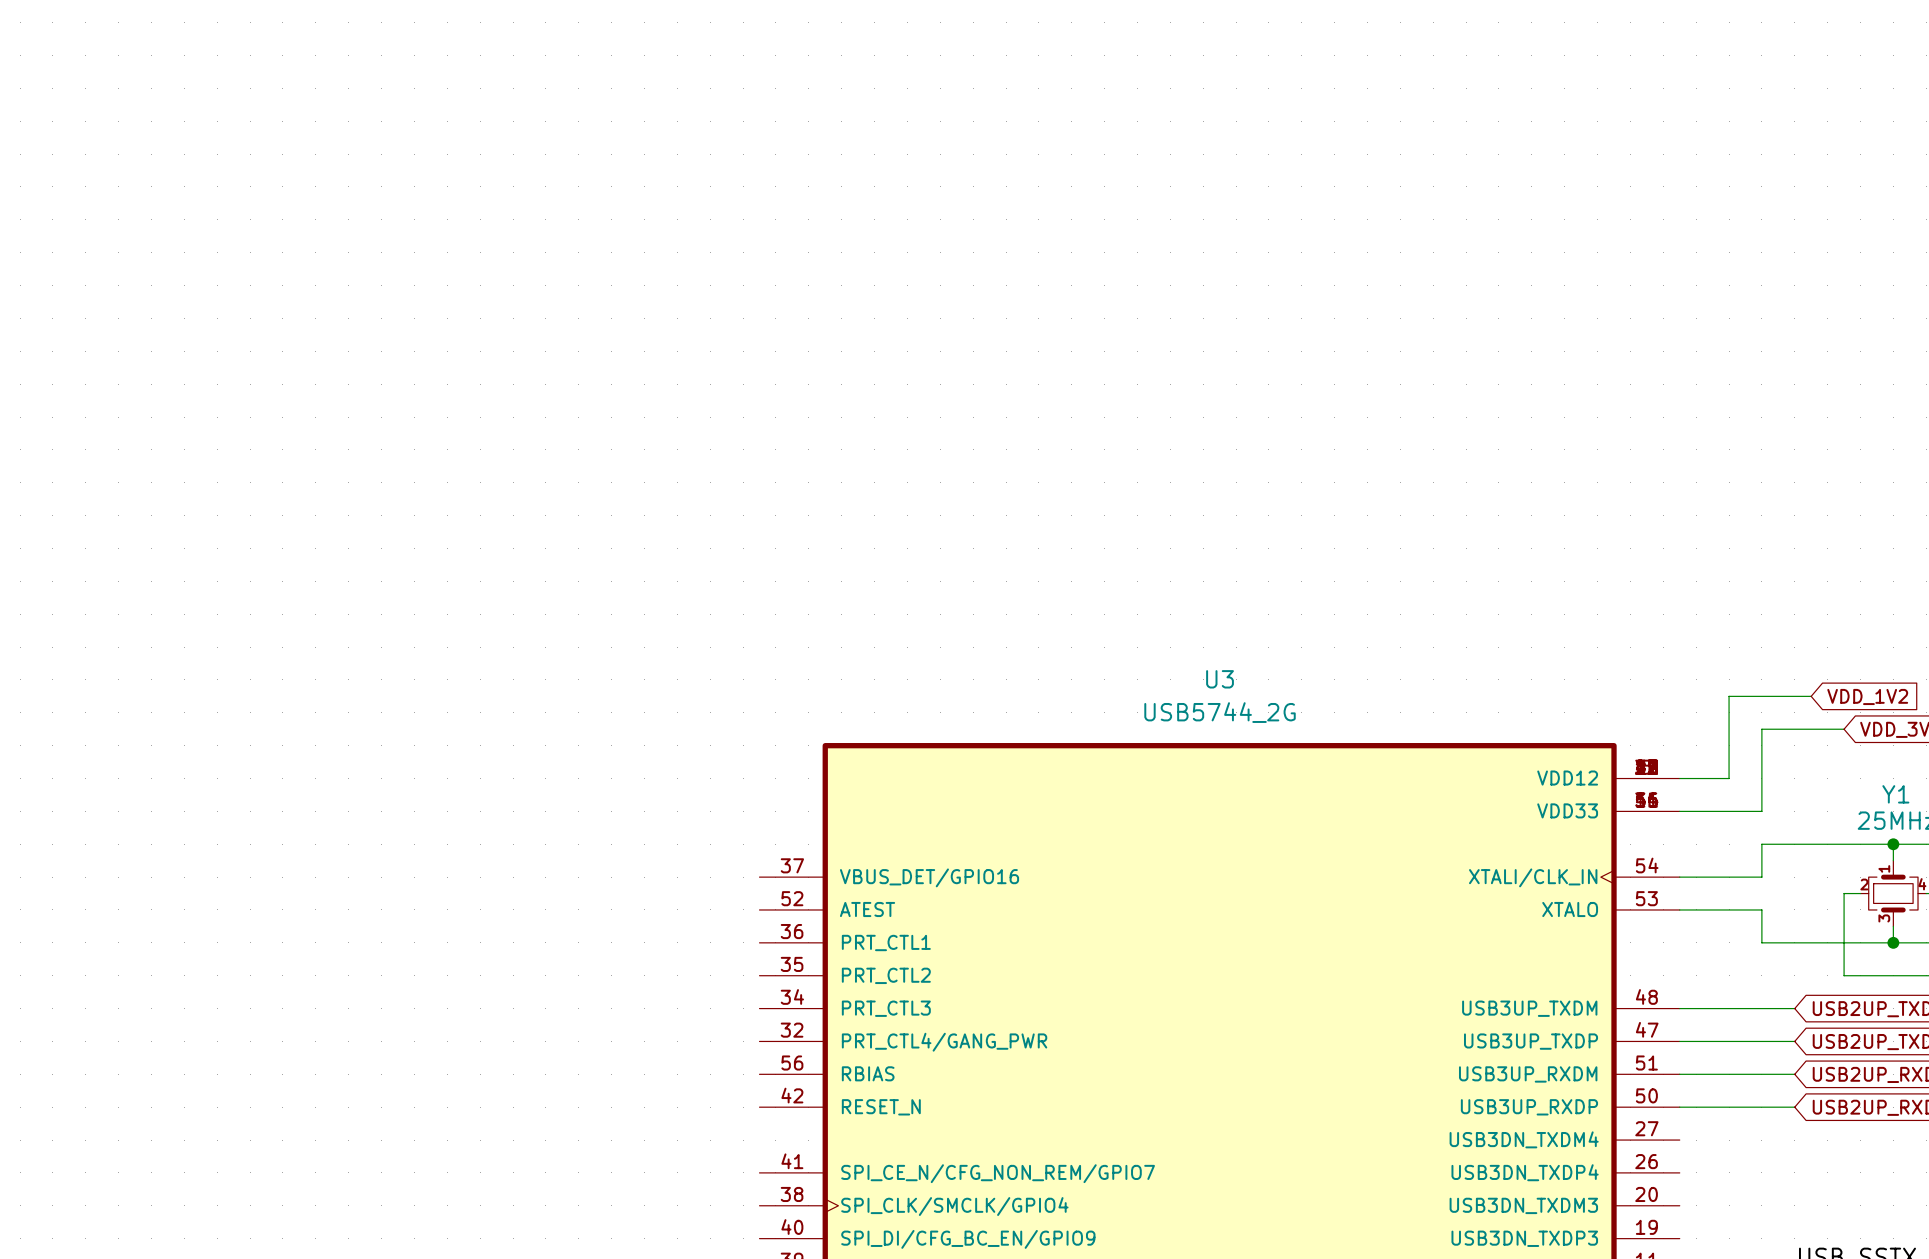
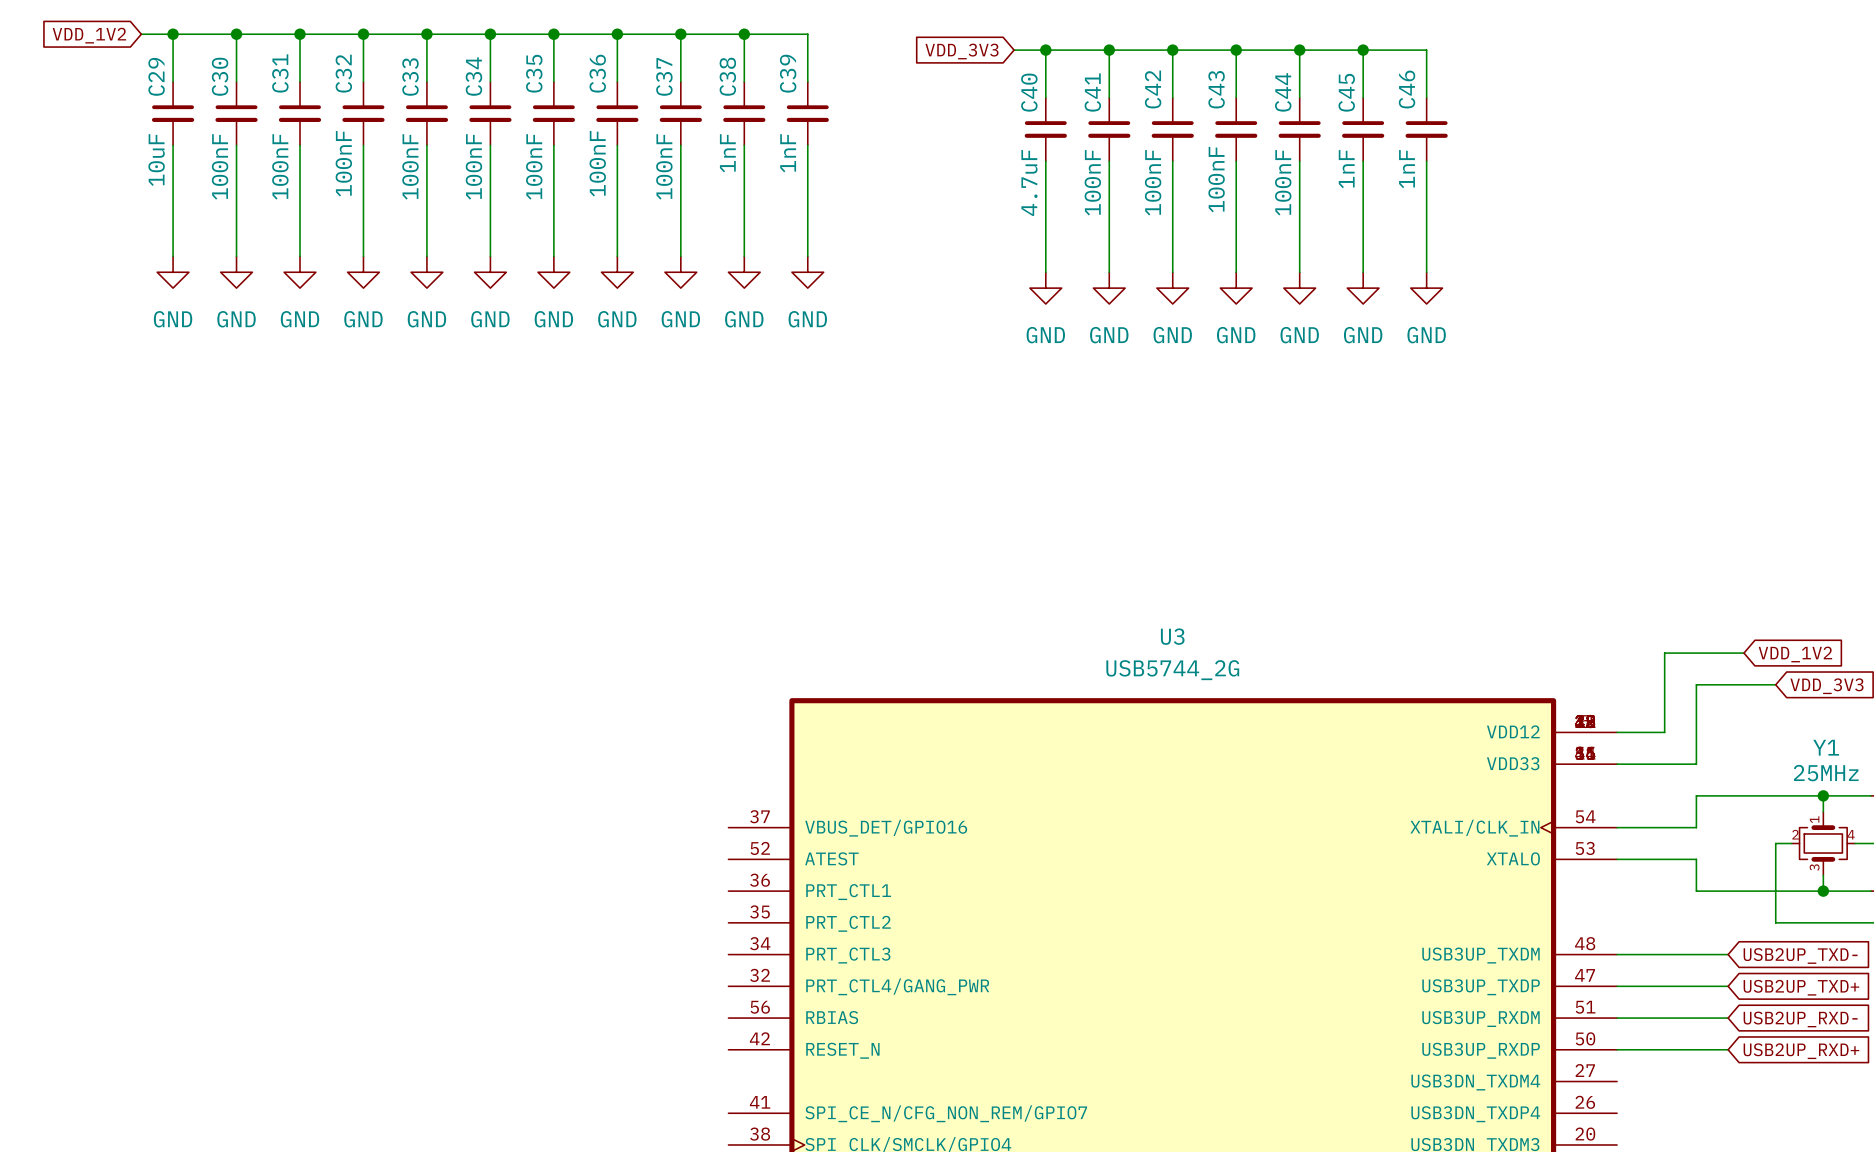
wire: none -> (141, 34) (807, 34) (807, 81)
wire: none -> (173, 34) (173, 81)
junction: none -> (173, 34)
wire: none -> (236, 34) (236, 81)
junction: none -> (236, 34)
wire: none -> (299, 34) (299, 81)
junction: none -> (299, 34)
wire: none -> (363, 34) (363, 81)
junction: none -> (363, 34)
wire: none -> (426, 34) (426, 81)
junction: none -> (426, 34)
wire: none -> (490, 34) (490, 81)
junction: none -> (490, 34)
wire: none -> (553, 34) (553, 81)
junction: none -> (553, 34)
wire: none -> (617, 34) (617, 81)
junction: none -> (617, 34)
wire: none -> (680, 34) (680, 81)
junction: none -> (680, 34)
wire: none -> (744, 34) (744, 81)
junction: none -> (744, 34)
global label: none -> VDD_1V2 (89, 35)
wire: none -> (1014, 50) (1426, 50) (1426, 97)
wire: none -> (1045, 50) (1045, 97)
junction: none -> (1045, 50)
wire: none -> (1109, 50) (1109, 97)
junction: none -> (1109, 50)
wire: none -> (1172, 50) (1172, 97)
junction: none -> (1172, 50)
wire: none -> (1236, 50) (1236, 97)
junction: none -> (1236, 50)
wire: none -> (1299, 50) (1299, 97)
junction: none -> (1299, 50)
wire: none -> (1363, 50) (1363, 97)
junction: none -> (1363, 50)
global label: none -> VDD_3V3 (962, 51)
C29: none -> 10uF (173, 113)
C30: none -> 100nF (236, 113)
C31: none -> 100nF (299, 113)
C32: none -> 100nF (363, 113)
C33: none -> 100nF (426, 113)
C34: none -> 100nF (490, 113)
C35: none -> 100nF (553, 113)
C36: none -> 100nF (617, 113)
C37: none -> 100nF (680, 113)
C38: none -> 1nF (744, 113)
C39: none -> 1nF (807, 113)
C40: none -> 4.7uF (1045, 129)
C41: none -> 100nF (1109, 129)
C42: none -> 100nF (1172, 129)
C43: none -> 100nF (1236, 129)
C44: none -> 100nF (1299, 129)
C45: none -> 1nF (1363, 129)
C46: none -> 1nF (1426, 129)
wire: none -> (173, 145) (173, 256)
wire: none -> (236, 145) (236, 256)
wire: none -> (299, 145) (299, 256)
wire: none -> (363, 145) (363, 256)
wire: none -> (426, 145) (426, 256)
wire: none -> (490, 145) (490, 256)
wire: none -> (553, 145) (553, 256)
wire: none -> (617, 145) (617, 256)
wire: none -> (680, 145) (680, 256)
wire: none -> (744, 145) (744, 256)
wire: none -> (807, 145) (807, 256)
wire: none -> (1045, 161) (1045, 272)
wire: none -> (1109, 161) (1109, 272)
wire: none -> (1172, 161) (1172, 272)
wire: none -> (1236, 161) (1236, 272)
wire: none -> (1299, 161) (1299, 272)
wire: none -> (1363, 161) (1363, 272)
wire: none -> (1426, 161) (1426, 272)
power symbol: none -> GND (173, 272)
power symbol: none -> GND (236, 272)
power symbol: none -> GND (299, 272)
power symbol: none -> GND (363, 272)
power symbol: none -> GND (426, 272)
power symbol: none -> GND (490, 272)
power symbol: none -> GND (553, 272)
power symbol: none -> GND (617, 272)
power symbol: none -> GND (680, 272)
power symbol: none -> GND (744, 272)
power symbol: none -> GND (807, 272)
power symbol: none -> GND (1045, 288)
power symbol: none -> GND (1109, 288)
power symbol: none -> GND (1172, 288)
power symbol: none -> GND (1236, 288)
power symbol: none -> GND (1299, 288)
power symbol: none -> GND (1363, 288)
power symbol: none -> GND (1426, 288)

